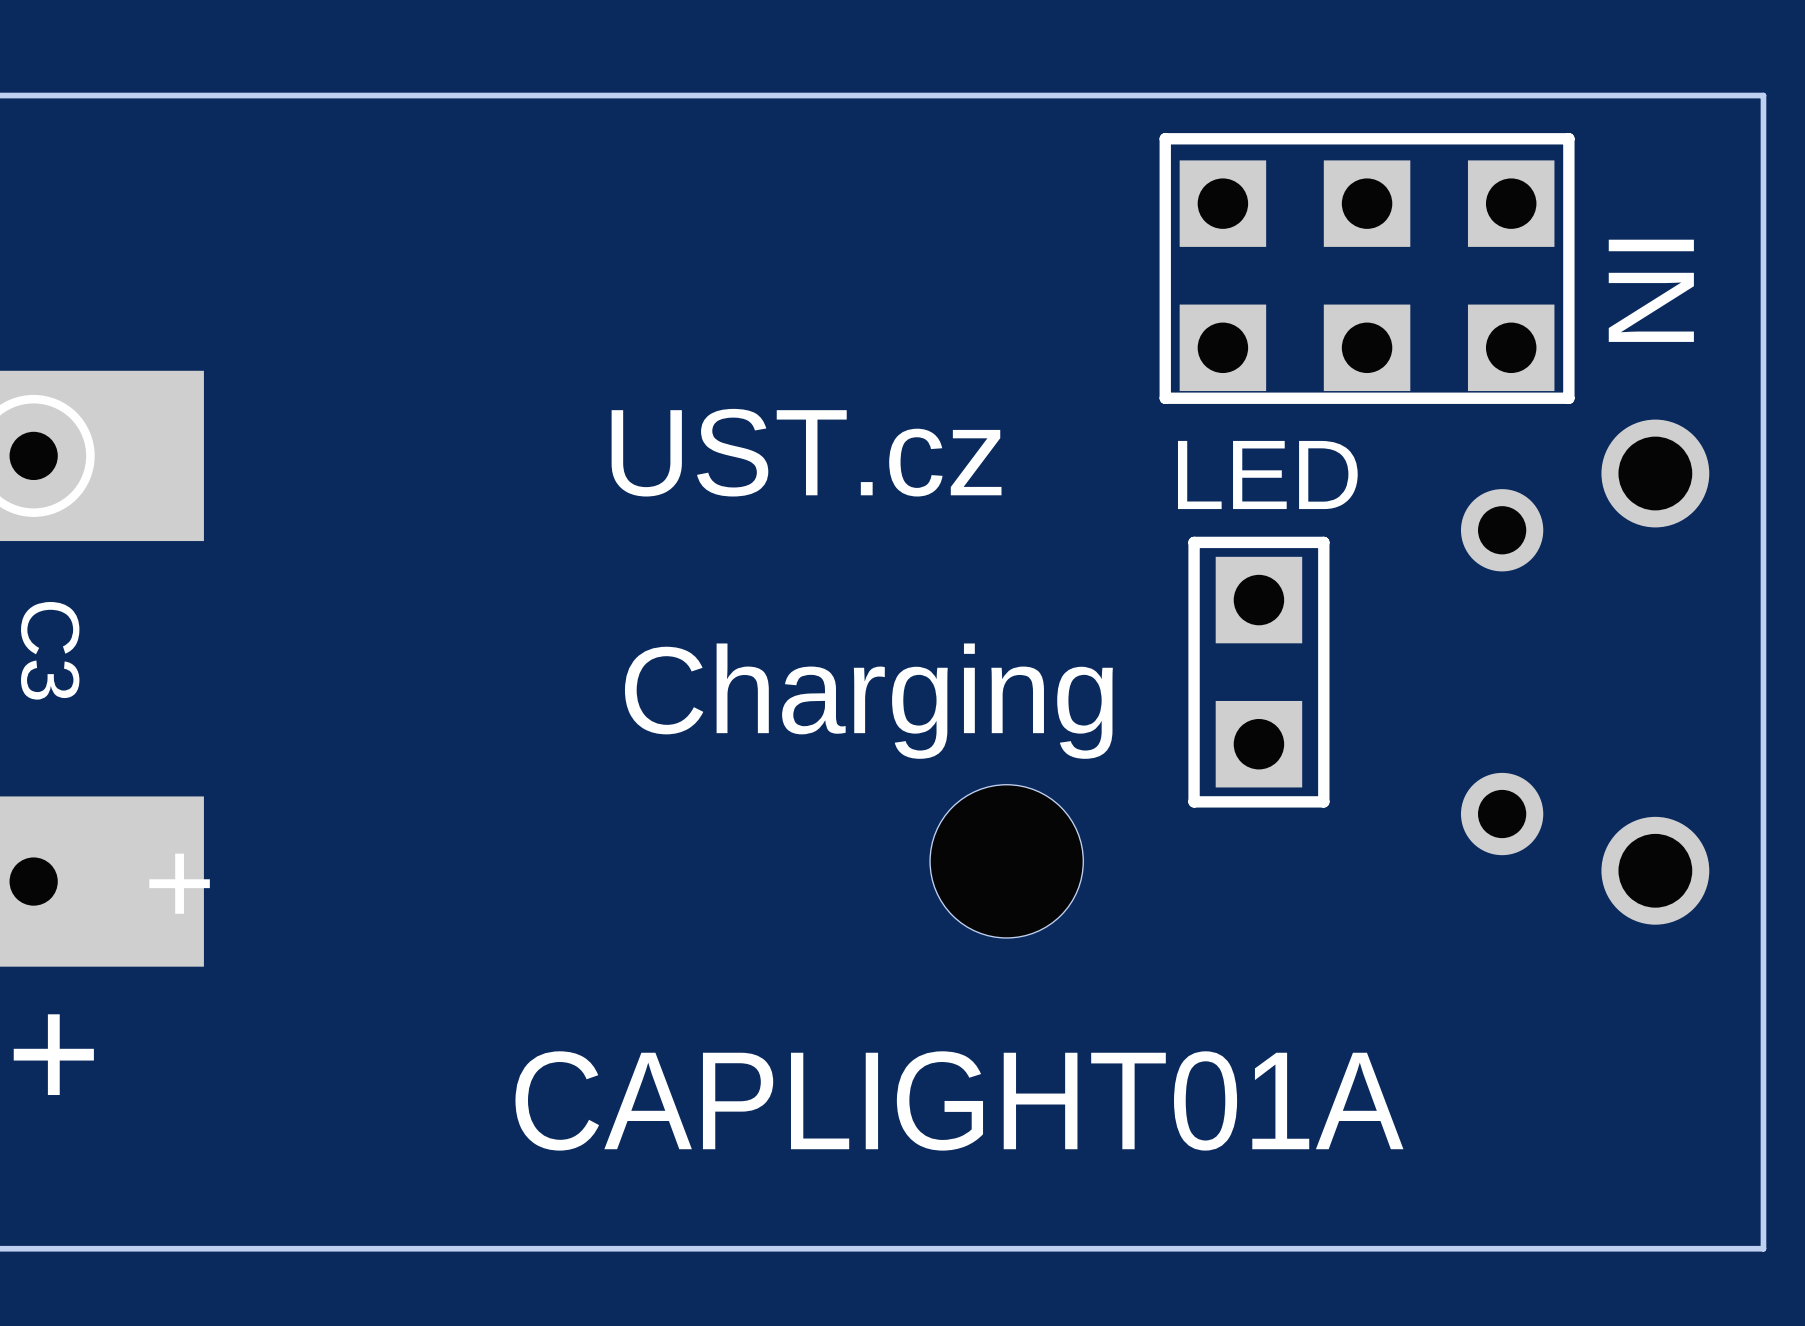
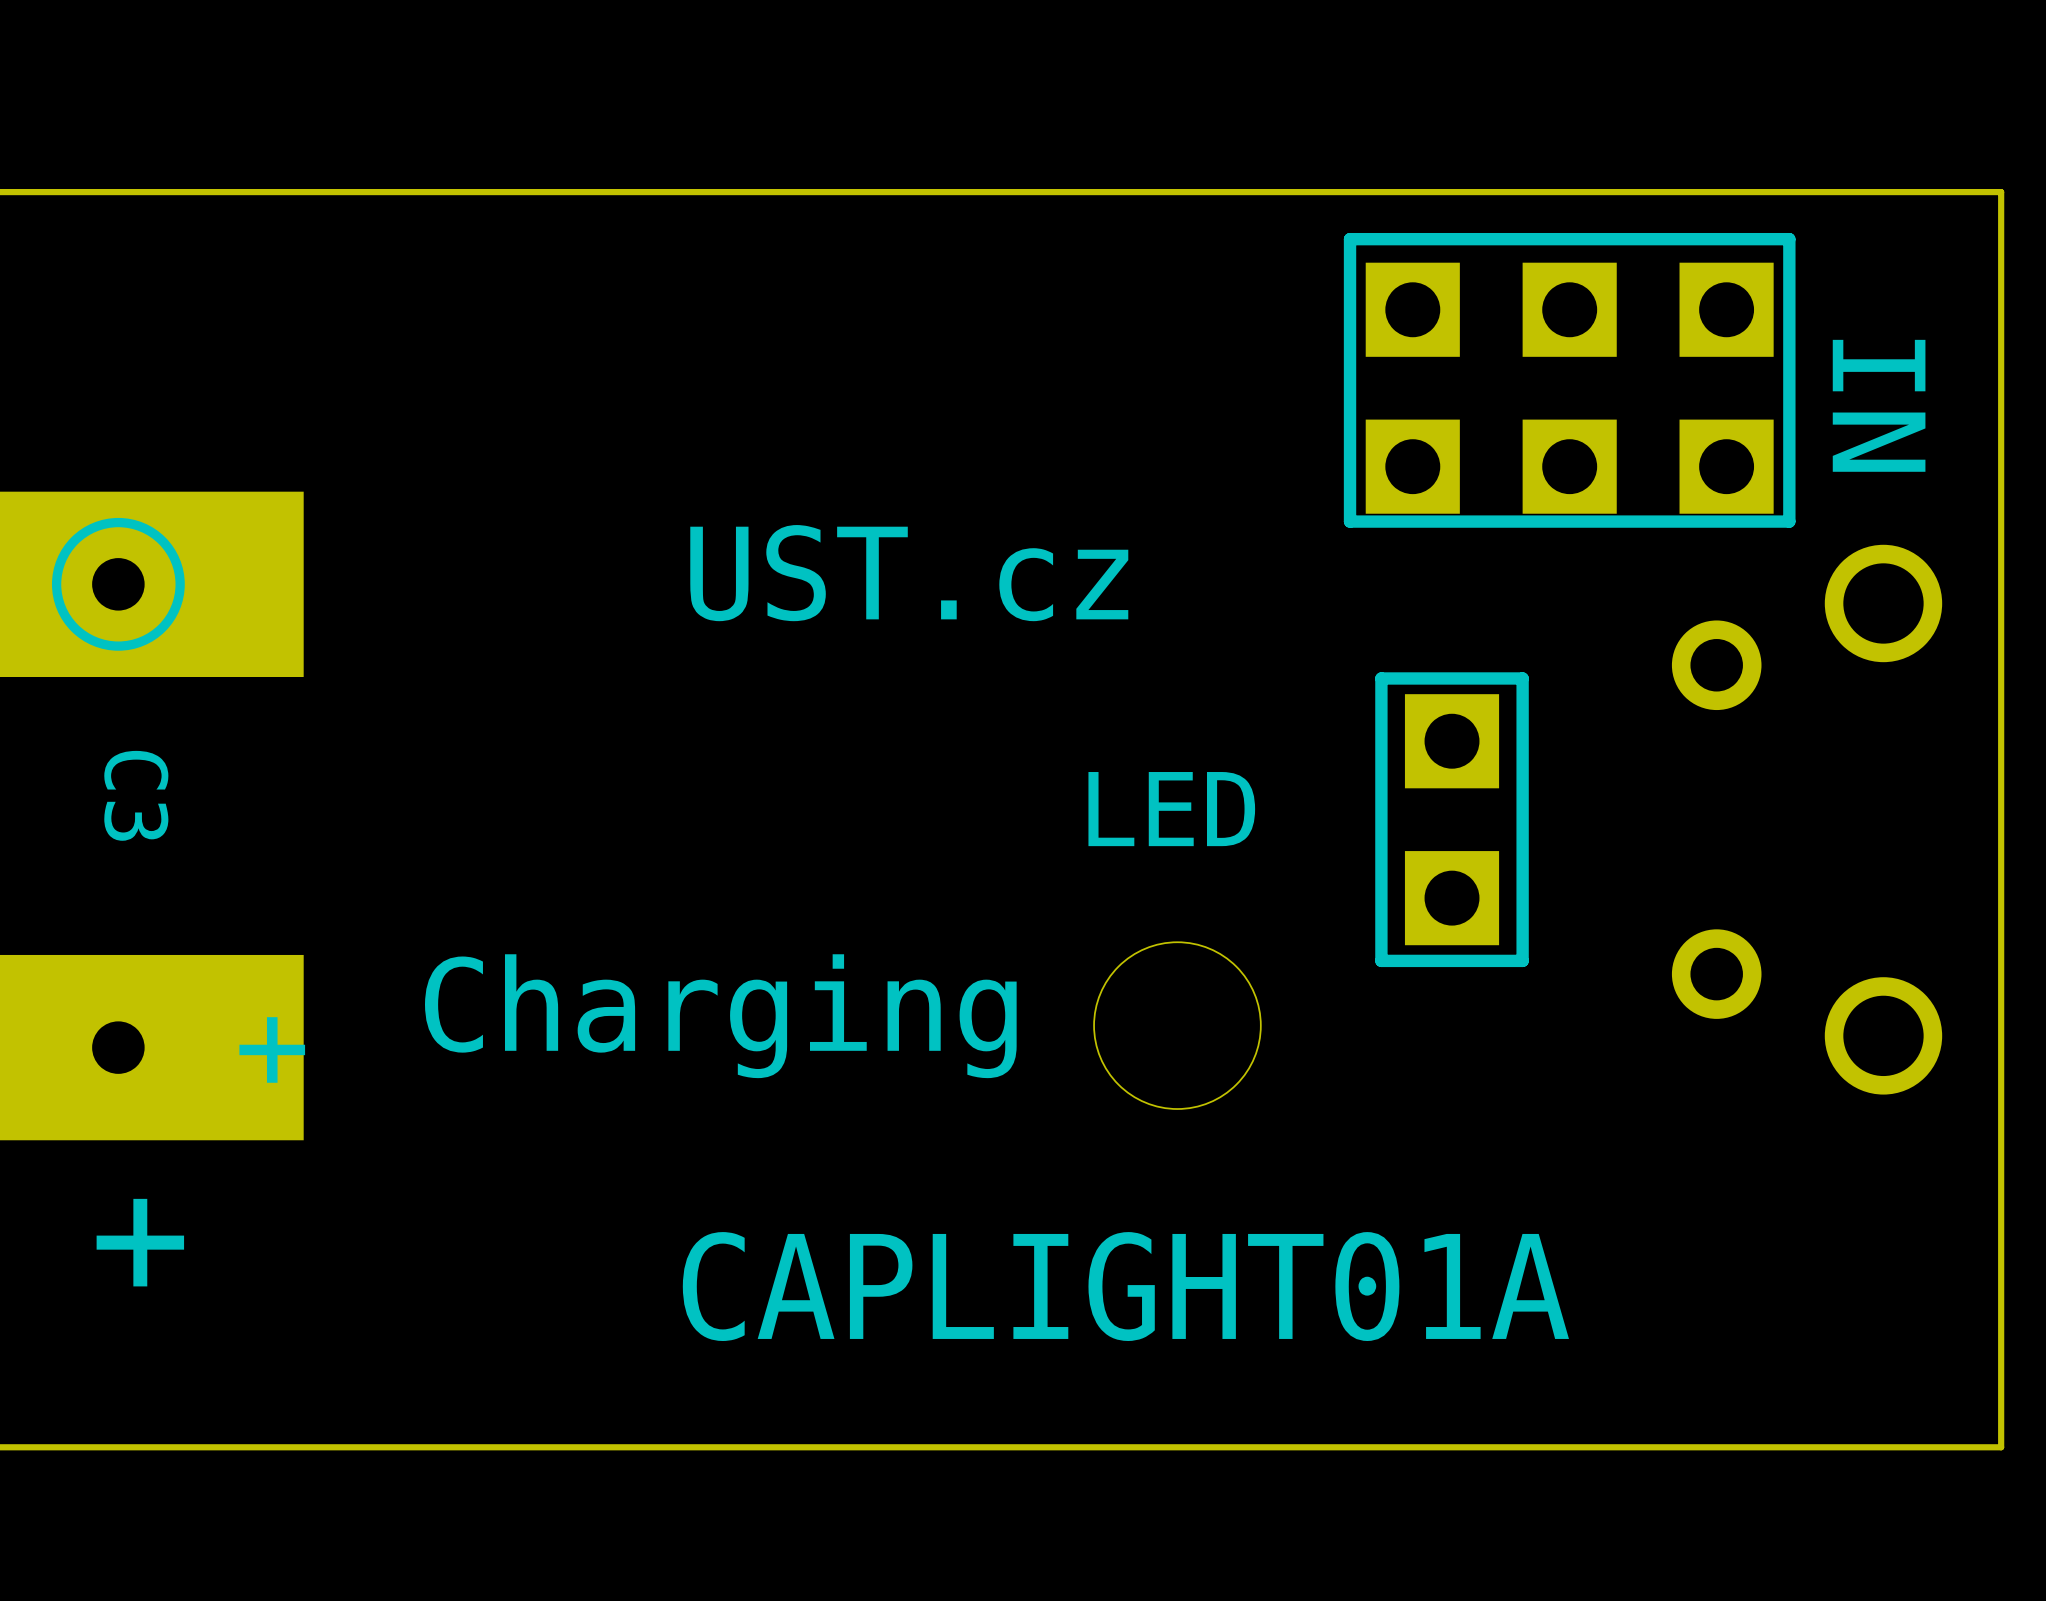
text position: UST.cz (806, 452) -> UST.cz (909, 573)
text position: LED (1267, 474) -> LED (1171, 809)
text position: Charging (868, 701) -> Charging (720, 1016)

